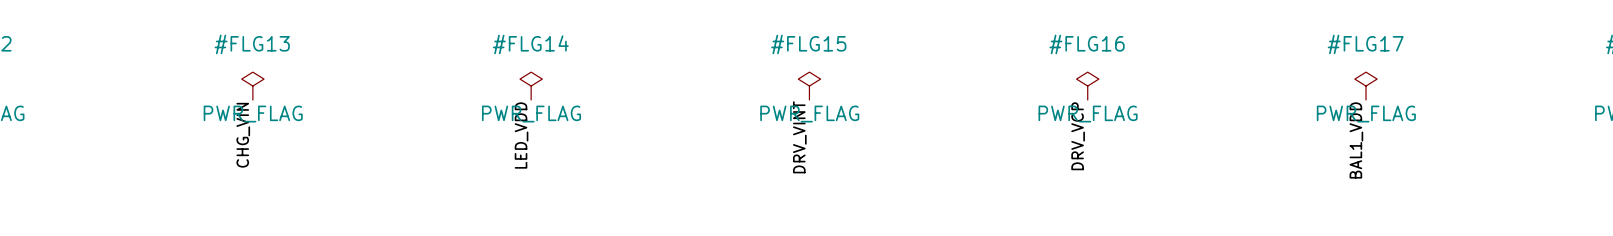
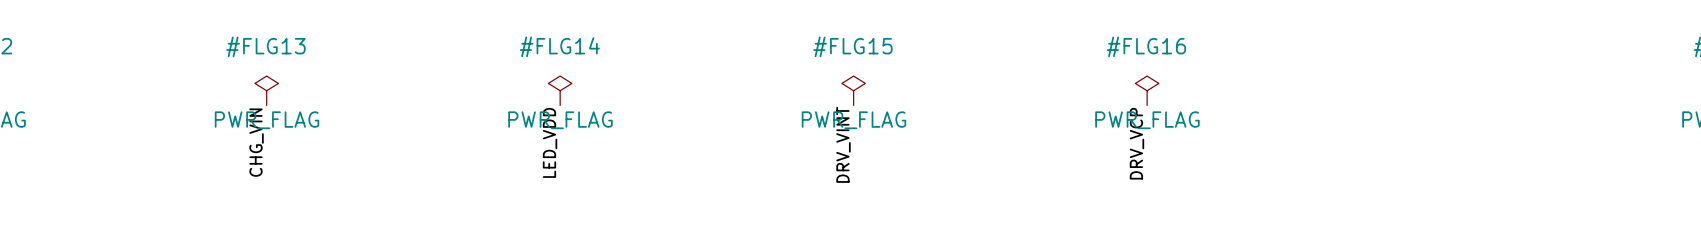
#FLG17: PWR_FLAG (1366, 86) -> none
label: BAL1_VDD (1356, 140) -> none

